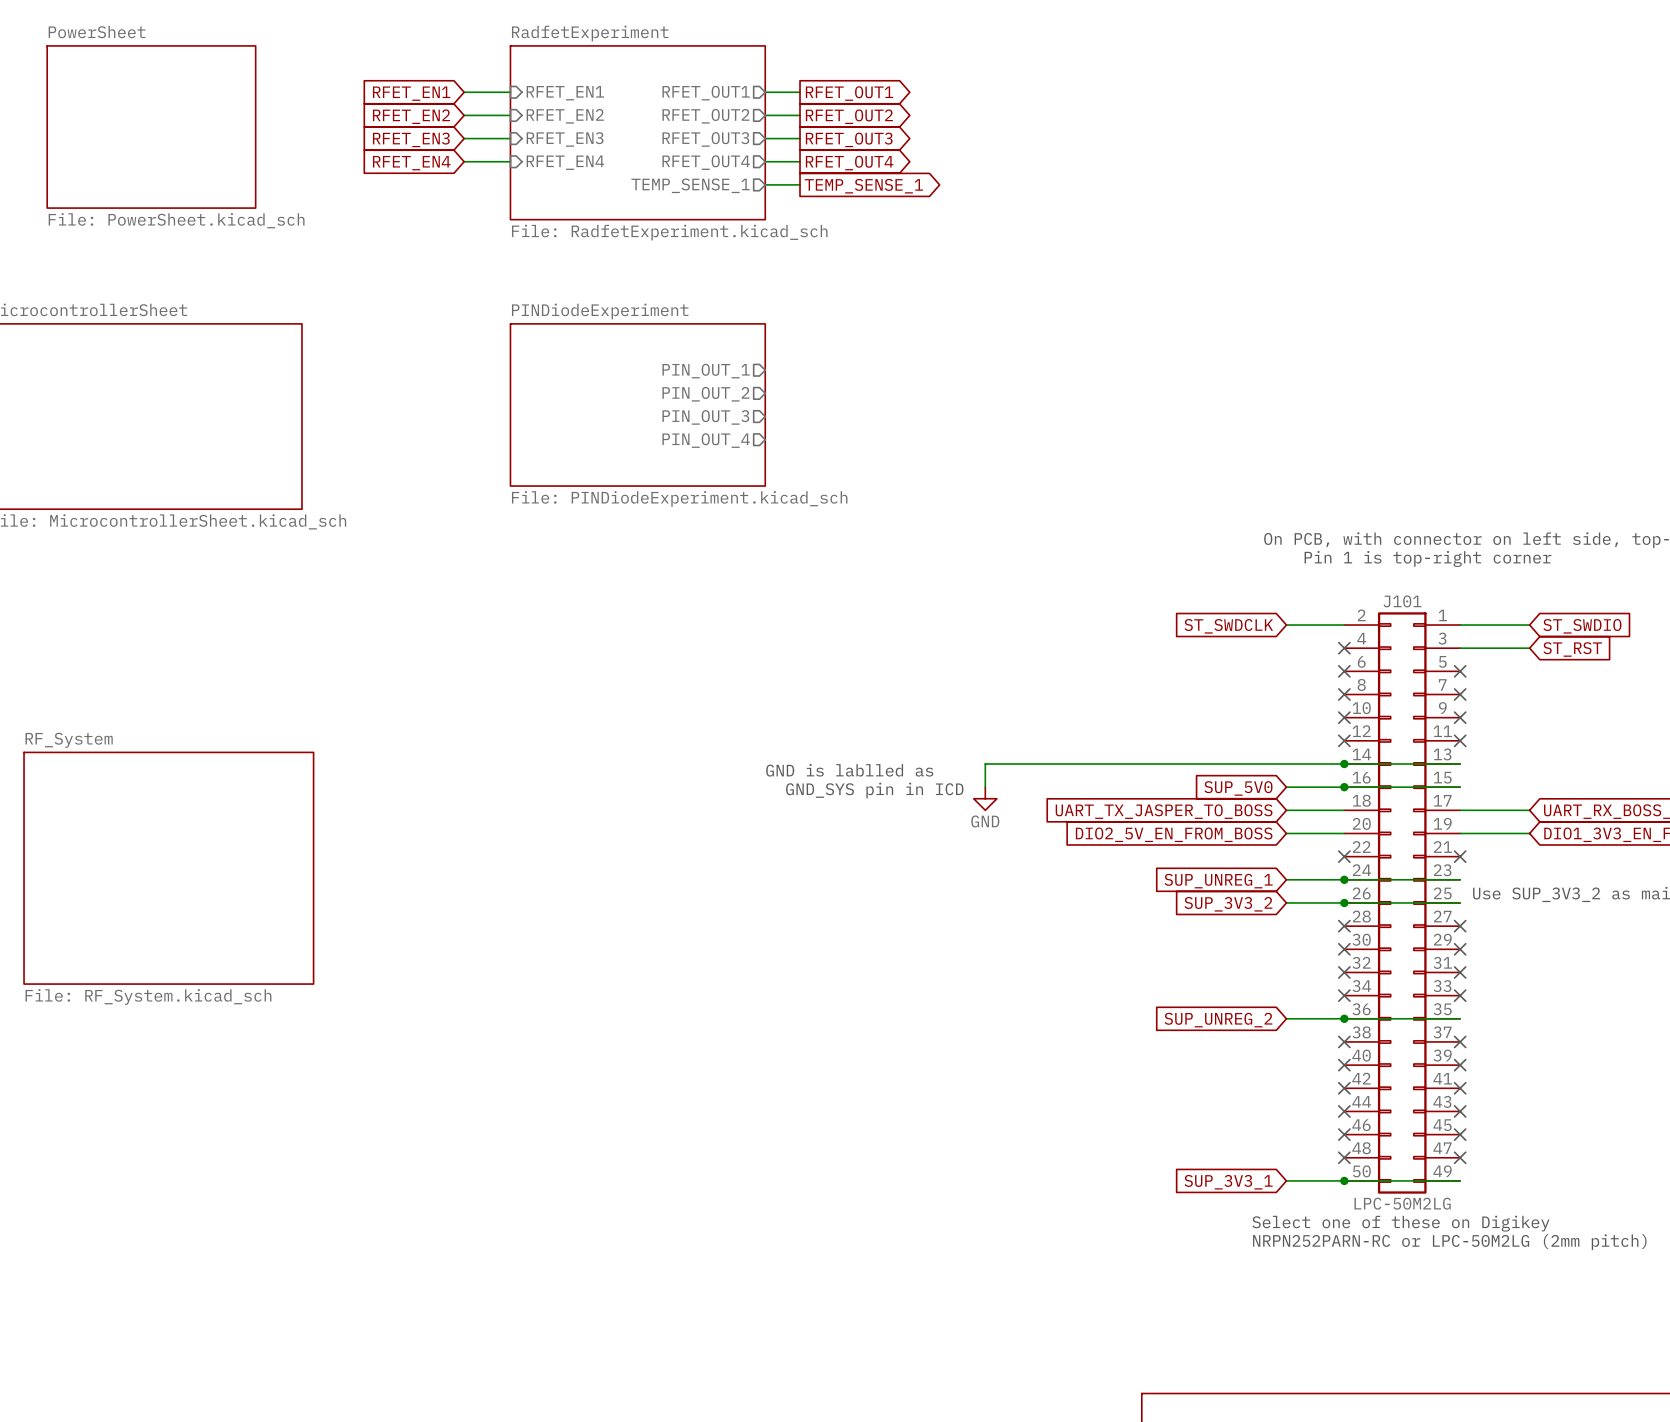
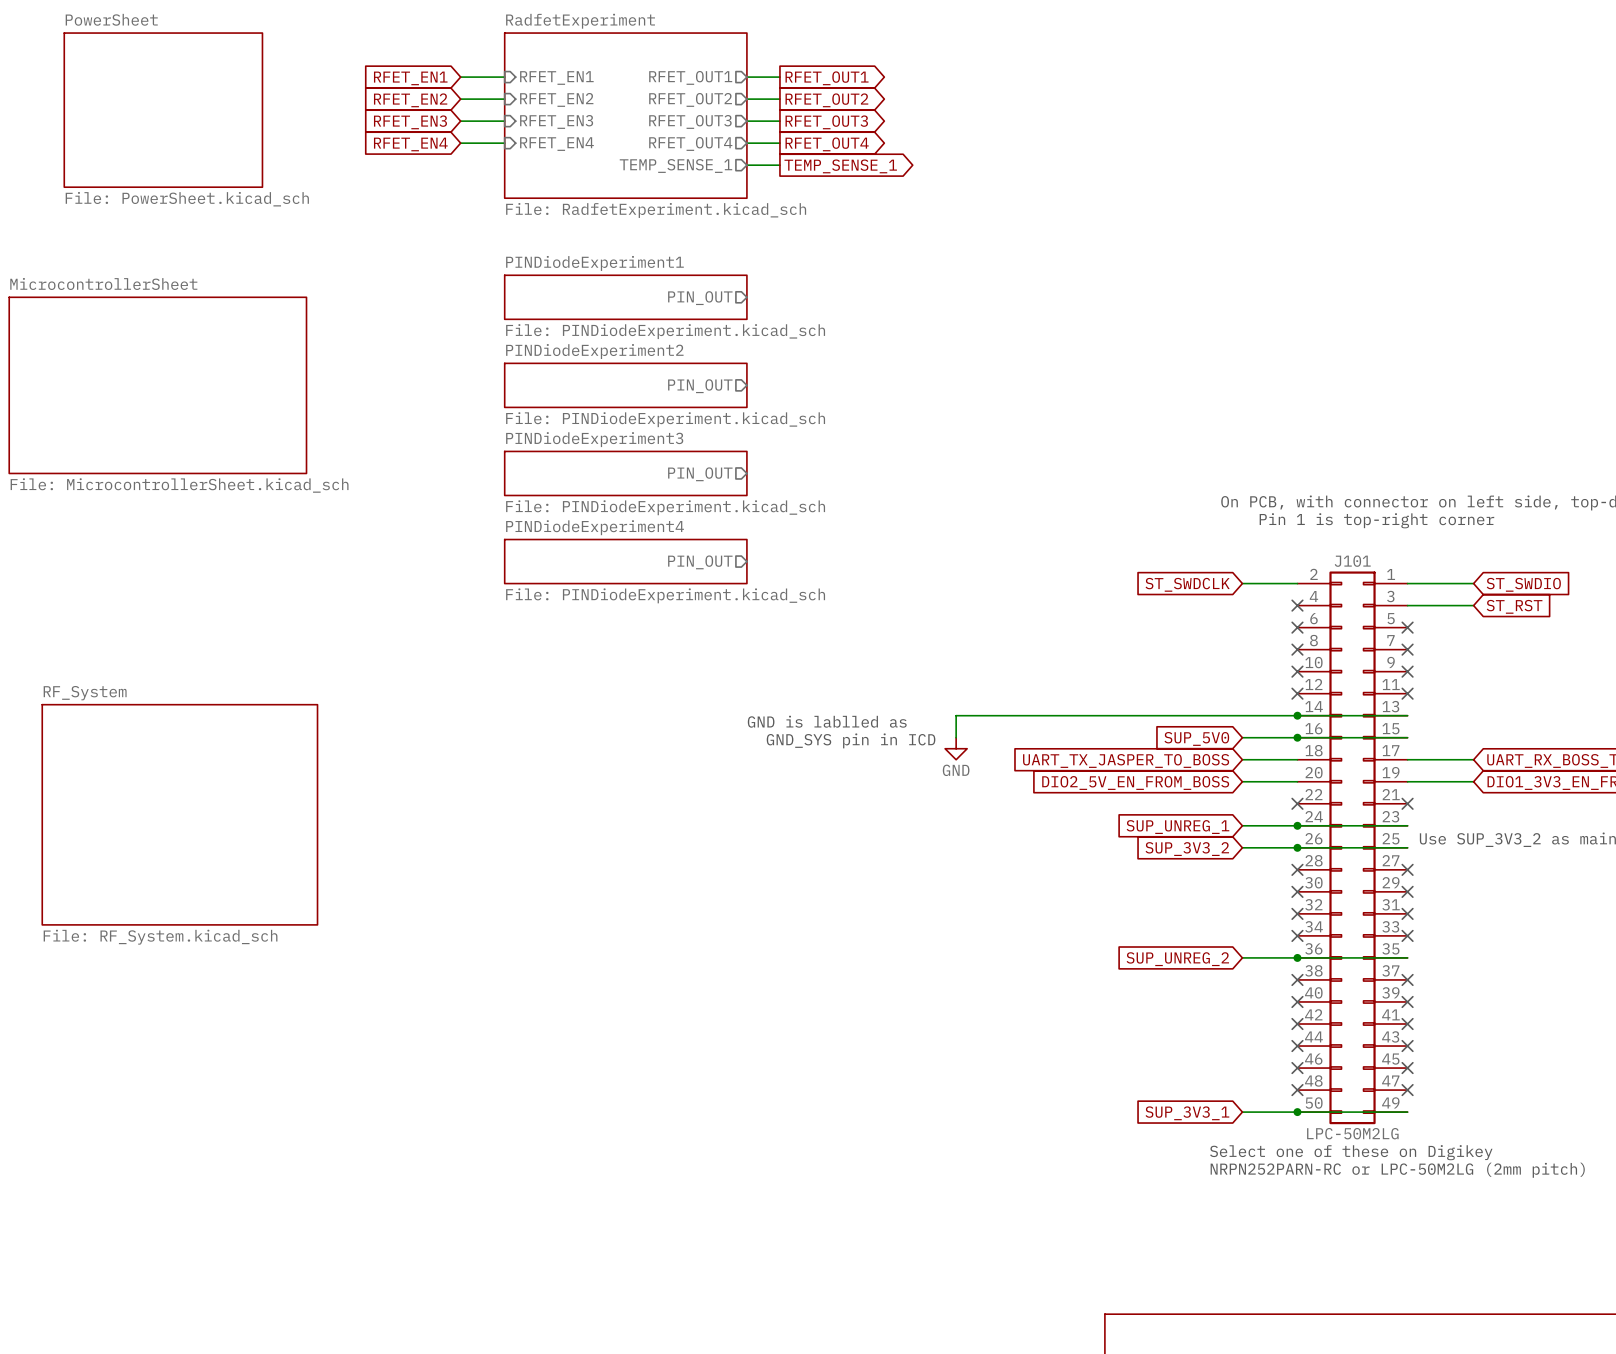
sheet PINDiodeExperiment1: none -> File: PINDiodeExperiment.kicad_sch (625, 297)
sheet pin: none -> PIN_OUT (700, 298)
sheet pin: PIN_OUT_1 (706, 371) -> none
sheet pin: PIN_OUT_2 (705, 394) -> none
sheet PINDiodeExperiment: File: PINDiodeExperiment.kicad_sch (637, 404) -> none
sheet PINDiodeExperiment2: none -> File: PINDiodeExperiment.kicad_sch (625, 385)
sheet pin: PIN_OUT_3 (705, 417) -> PIN_OUT (700, 386)
sheet pin: PIN_OUT_4 (706, 440) -> none
sheet PINDiodeExperiment3: none -> File: PINDiodeExperiment.kicad_sch (625, 473)
sheet pin: none -> PIN_OUT (700, 474)
sheet PINDiodeExperiment4: none -> File: PINDiodeExperiment.kicad_sch (625, 561)
sheet pin: none -> PIN_OUT (700, 562)

